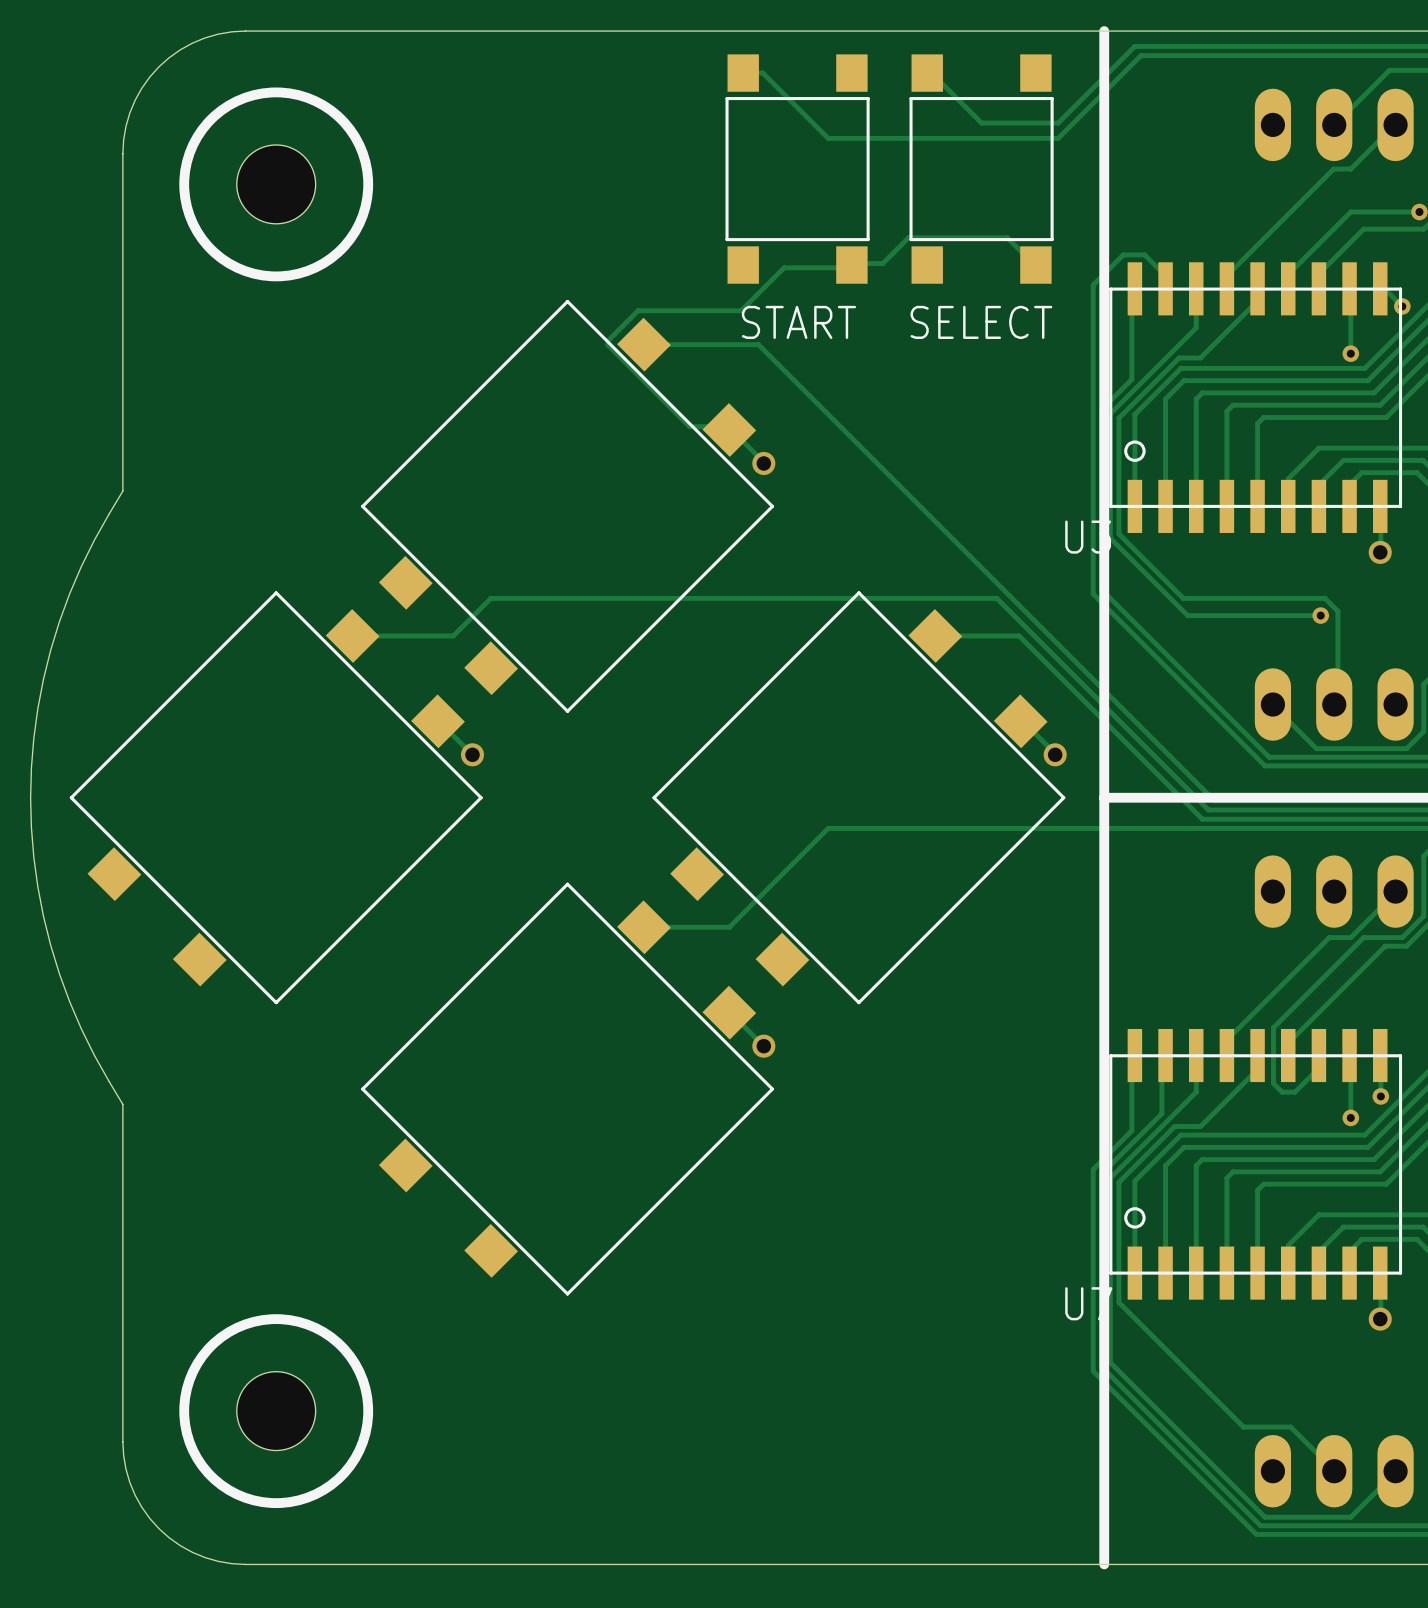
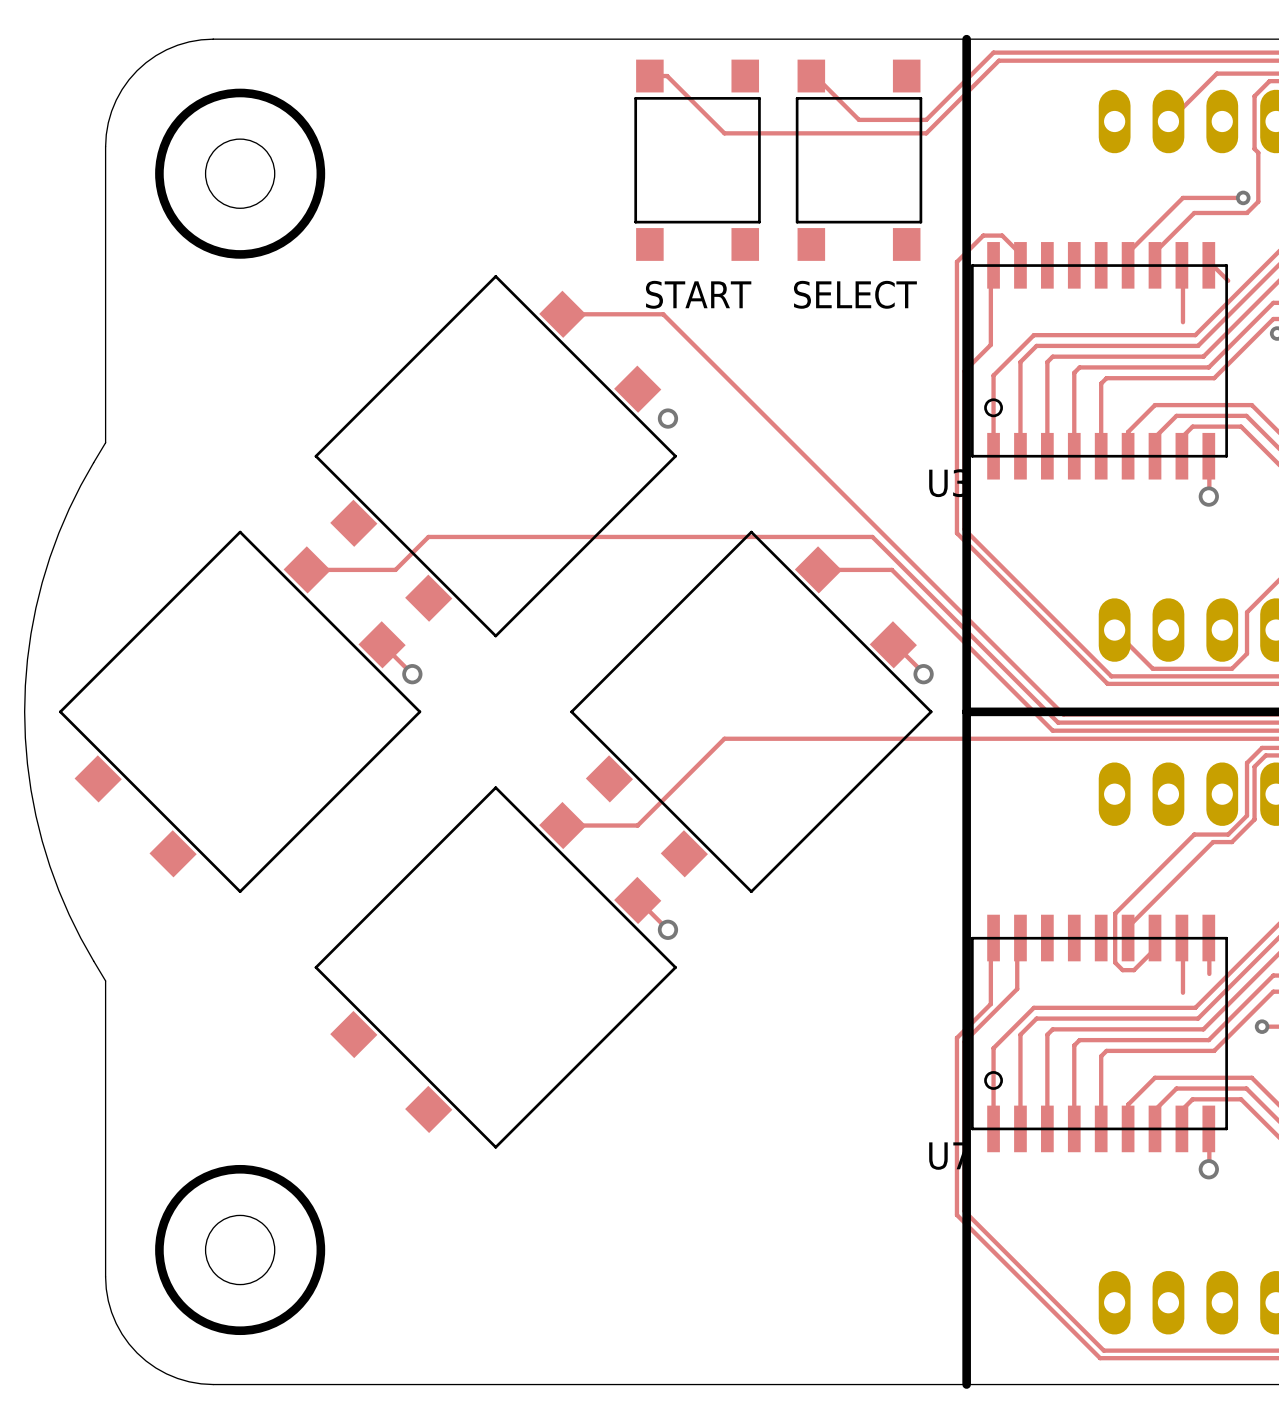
track: (1395, 124) (1350, 169) (1333, 169) (1230, 272) (1230, 284) (1226, 288) -> none
track: (1035, 265) (1007, 237) (908, 237) (882, 263) (852, 263) (848, 267) (784, 267) (741, 310) (638, 310) (608, 340) (608, 345) (689, 426) (728, 426) (729, 430) (732, 430) (763, 463) -> none
track: (1196, 288) (1196, 327) (1110, 413) (1110, 538) (1187, 615) (1320, 615) -> none
track: (1257, 288) (1256, 302) (1200, 357) (1179, 357) (1118, 418) (1118, 534) (1183, 598) (1325, 598) (1337, 611) (1337, 701) (1334, 704) -> none
via: (1402, 306) -> none
via: (1350, 353) -> none
via: (1320, 615) -> none
track: (1395, 891) (1350, 937) (1329, 937) (1230, 1036) (1230, 1053) (1226, 1055) -> none
track: (1196, 1055) (1196, 1092) (1110, 1178) (1110, 1362) (1264, 1517) (1350, 1517) (1395, 1471) -> none
track: (1257, 1055) (1256, 1070) (1200, 1126) (1174, 1126) (1118, 1182) (1118, 1302) (1243, 1427) (1290, 1427) (1334, 1471) -> none
via: (1380, 1096) -> none
via: (1350, 1117) -> none

